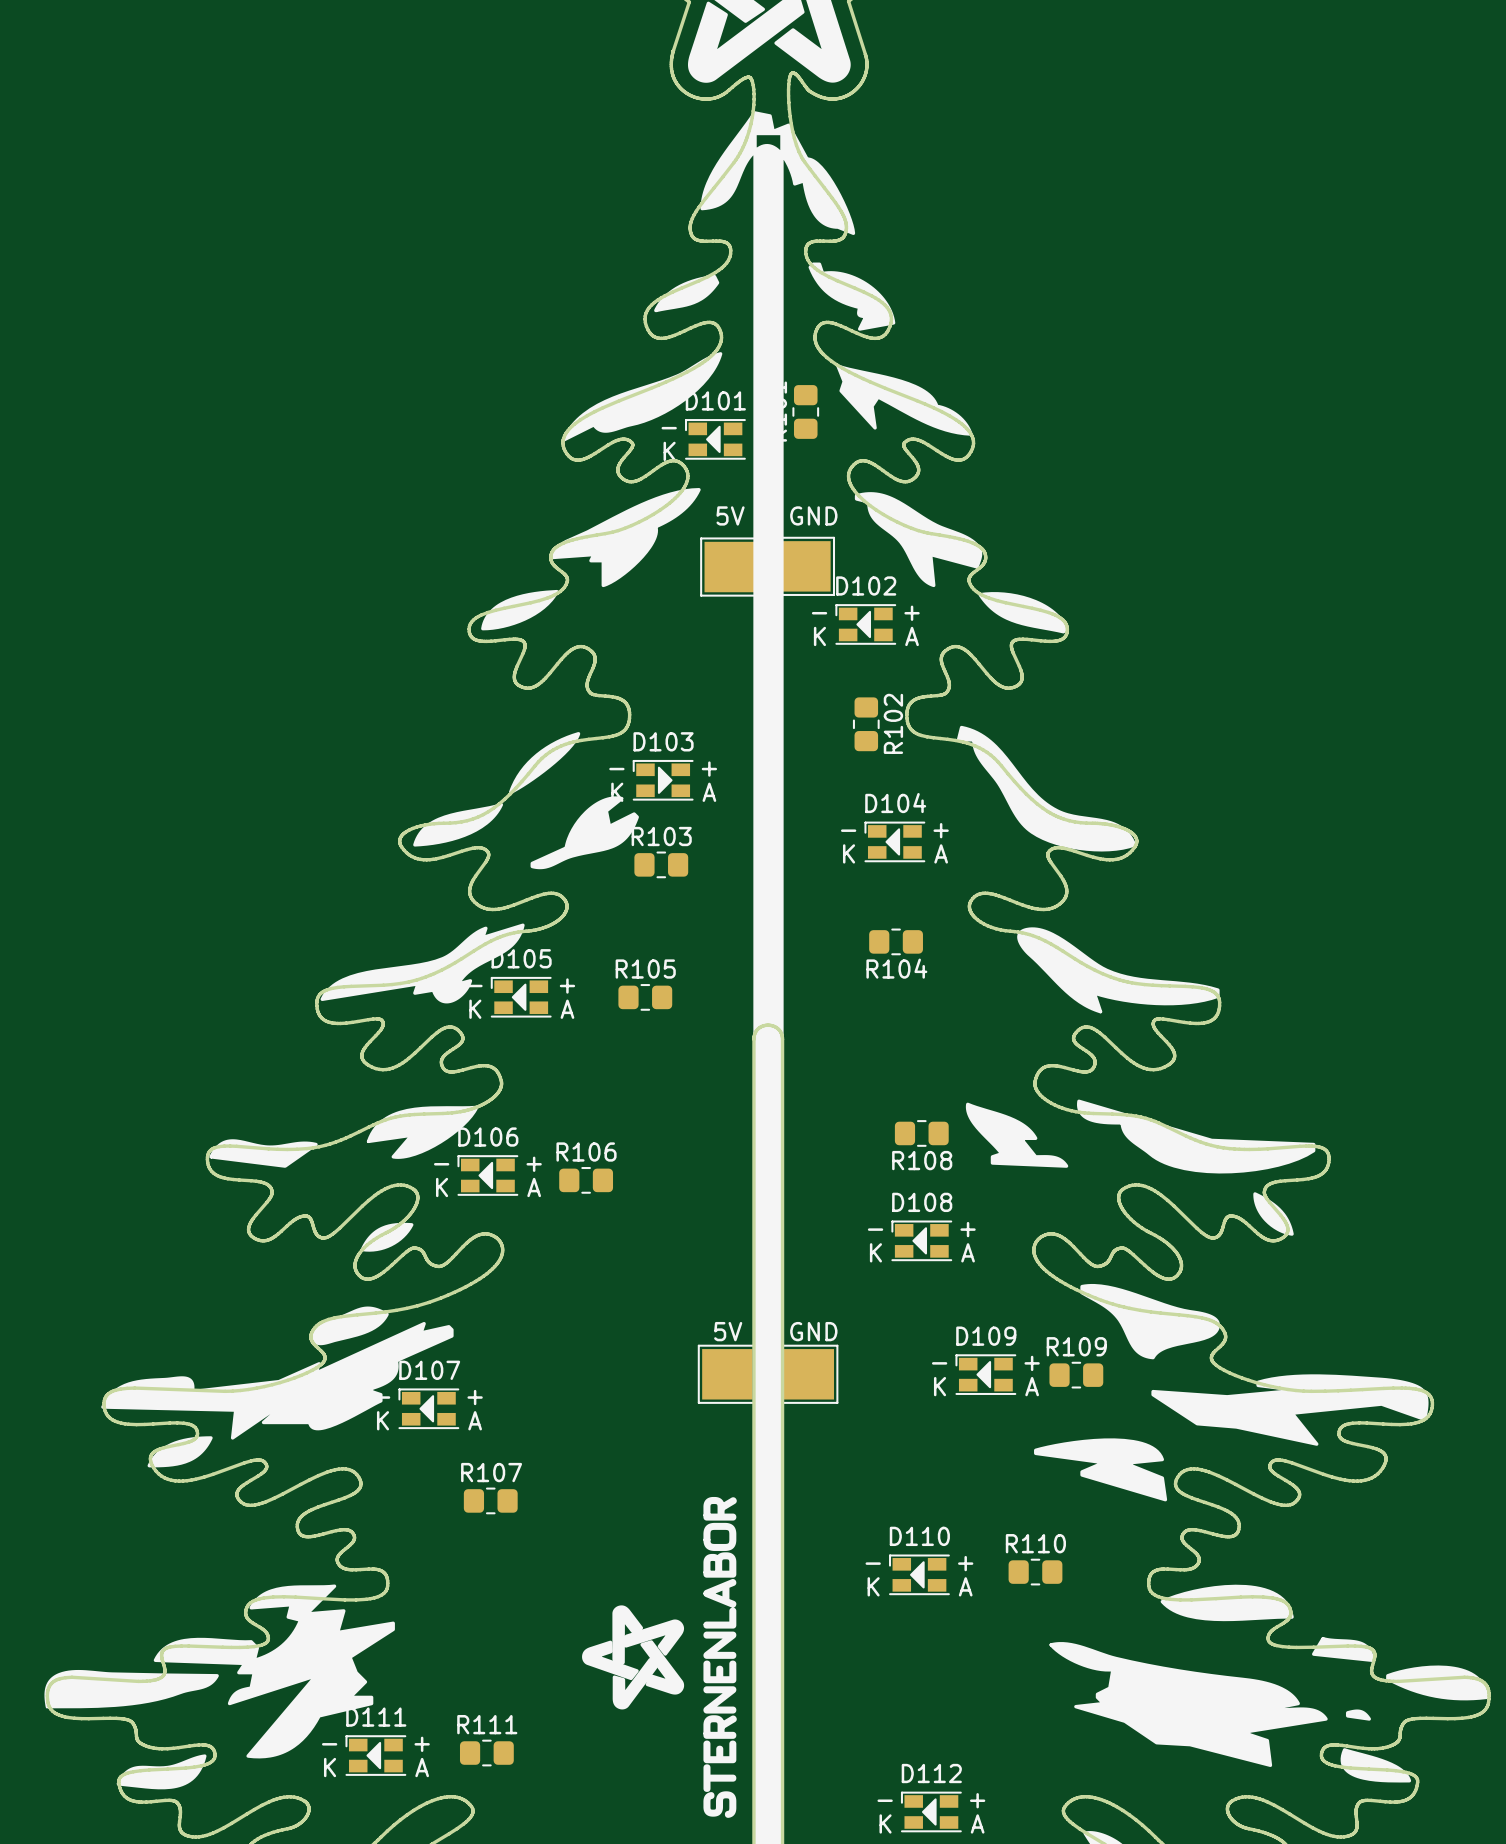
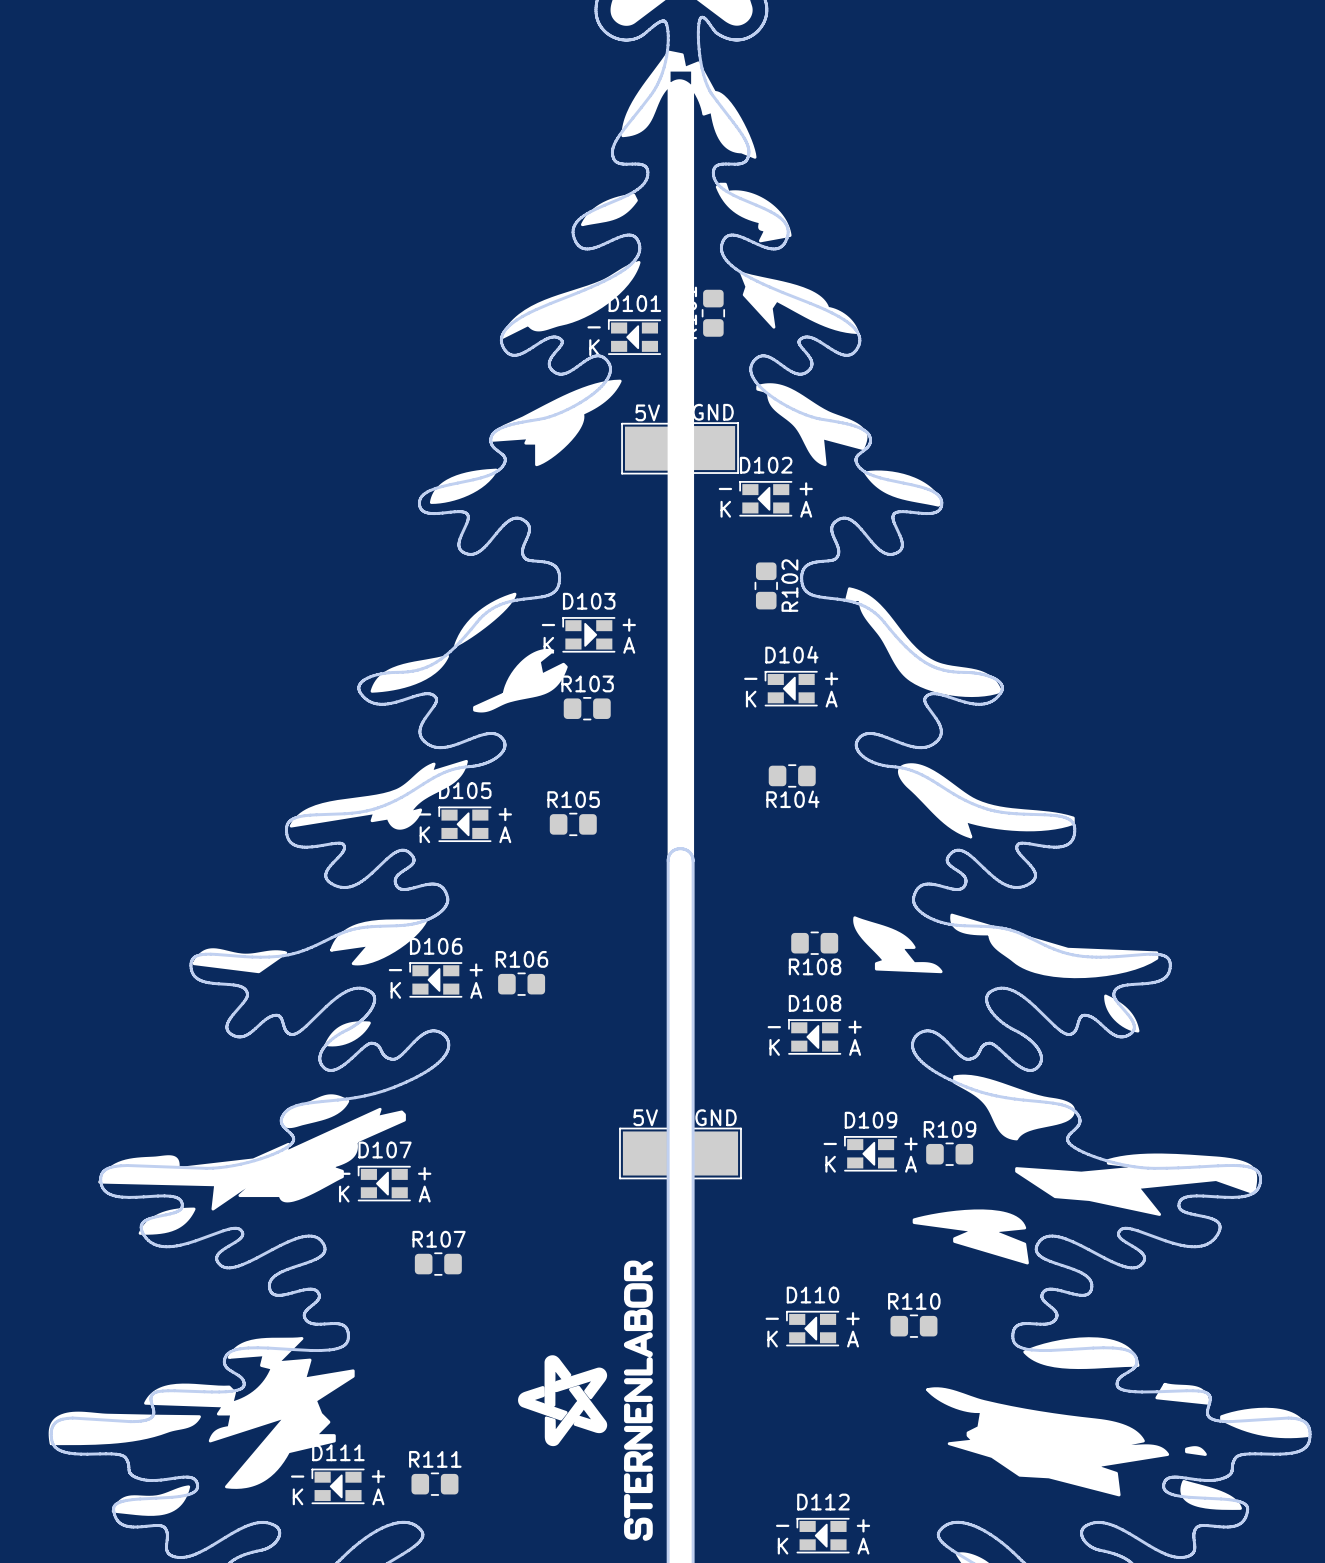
text: 5V (730, 515) -> none
text: GND (813, 515) -> none
GND name: none -> GND (713, 412)
5V name: none -> 5V (647, 412)
text: 5V (728, 1331) -> none
text: GND (813, 1331) -> none
5V name: none -> 5V (645, 1117)
GND name: none -> GND (716, 1117)

